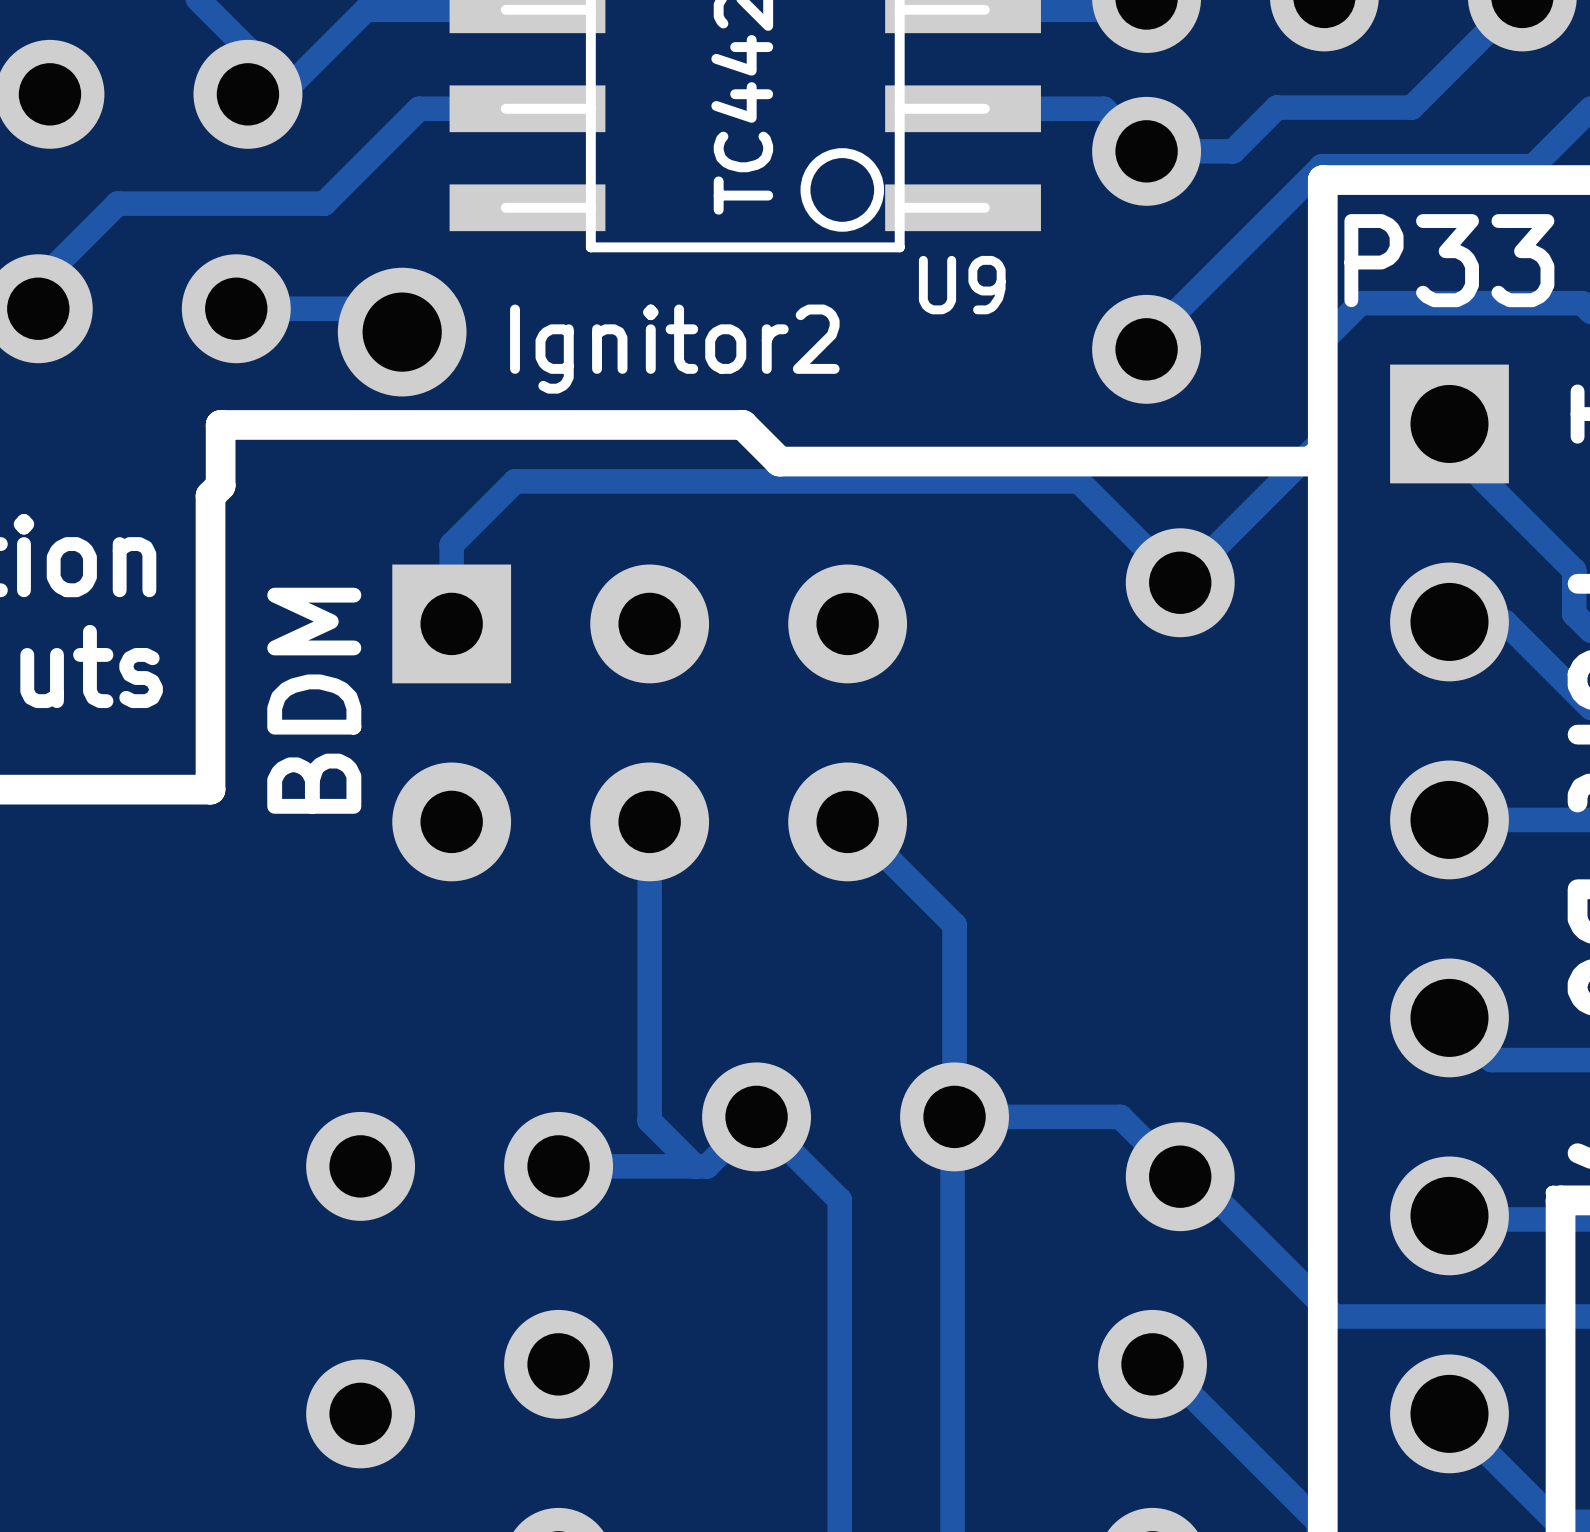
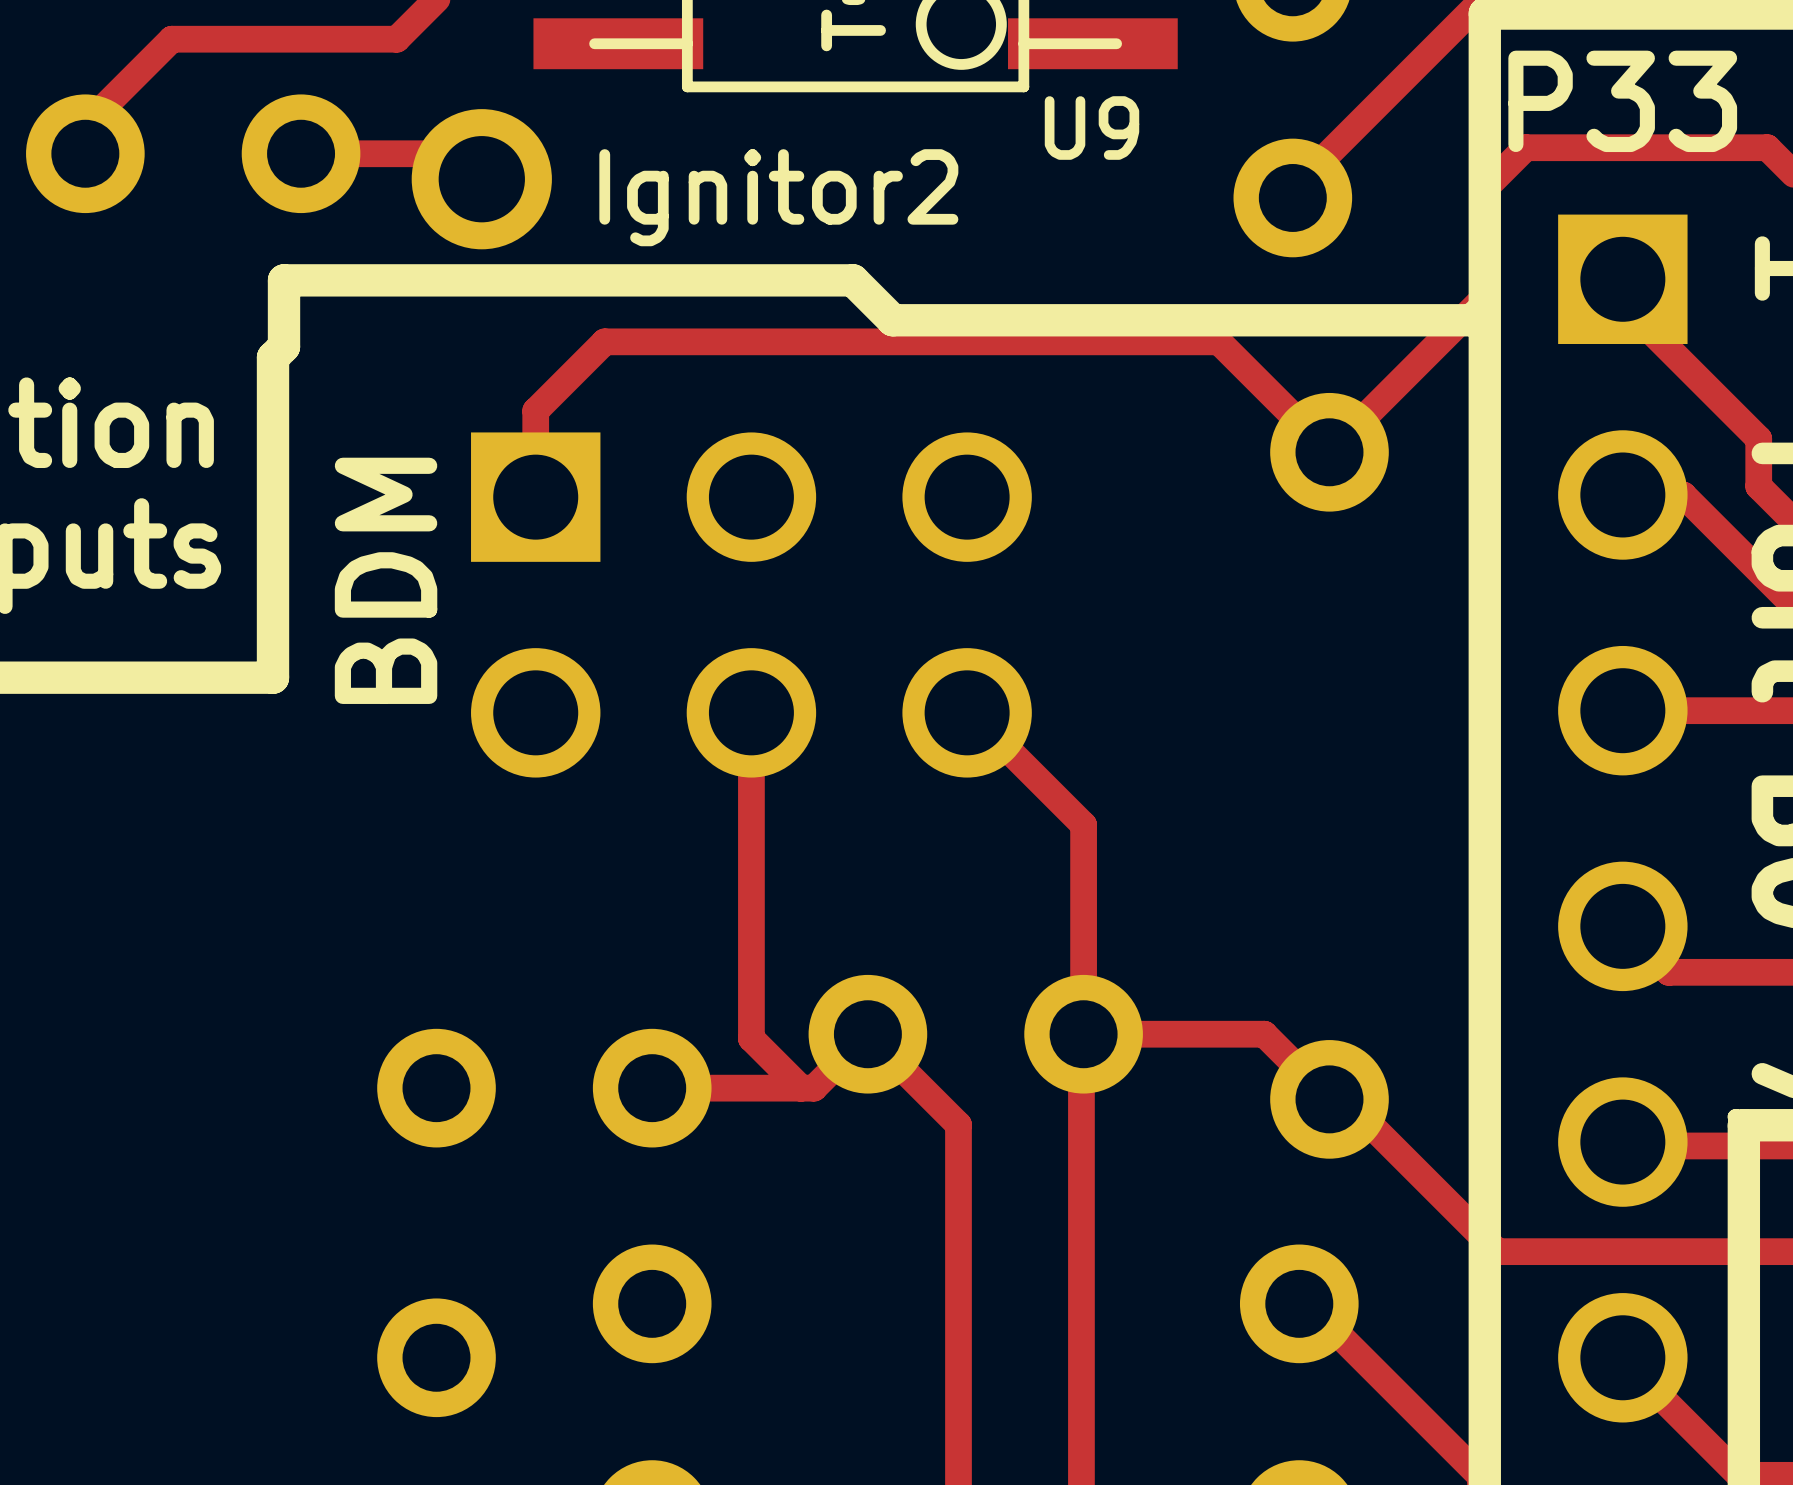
part footprint: [392, 564, 908, 882] -> [471, 432, 1032, 778]

